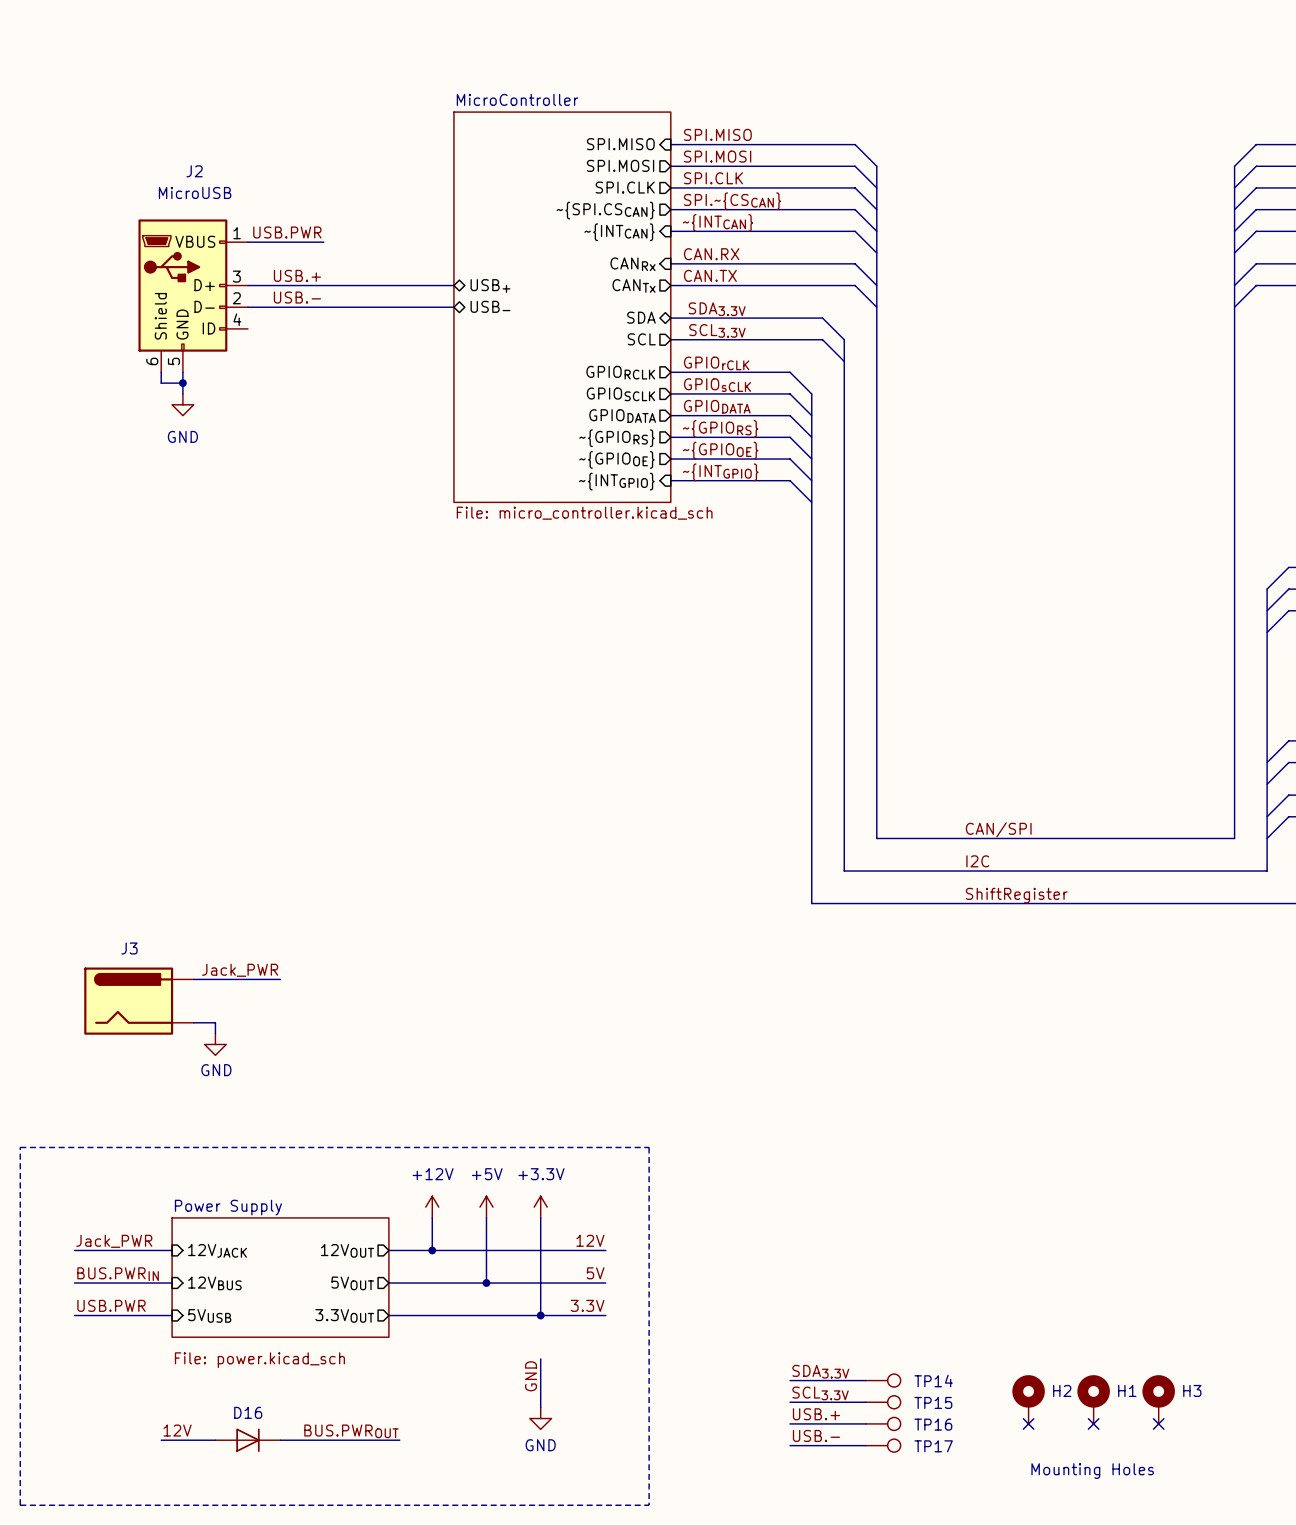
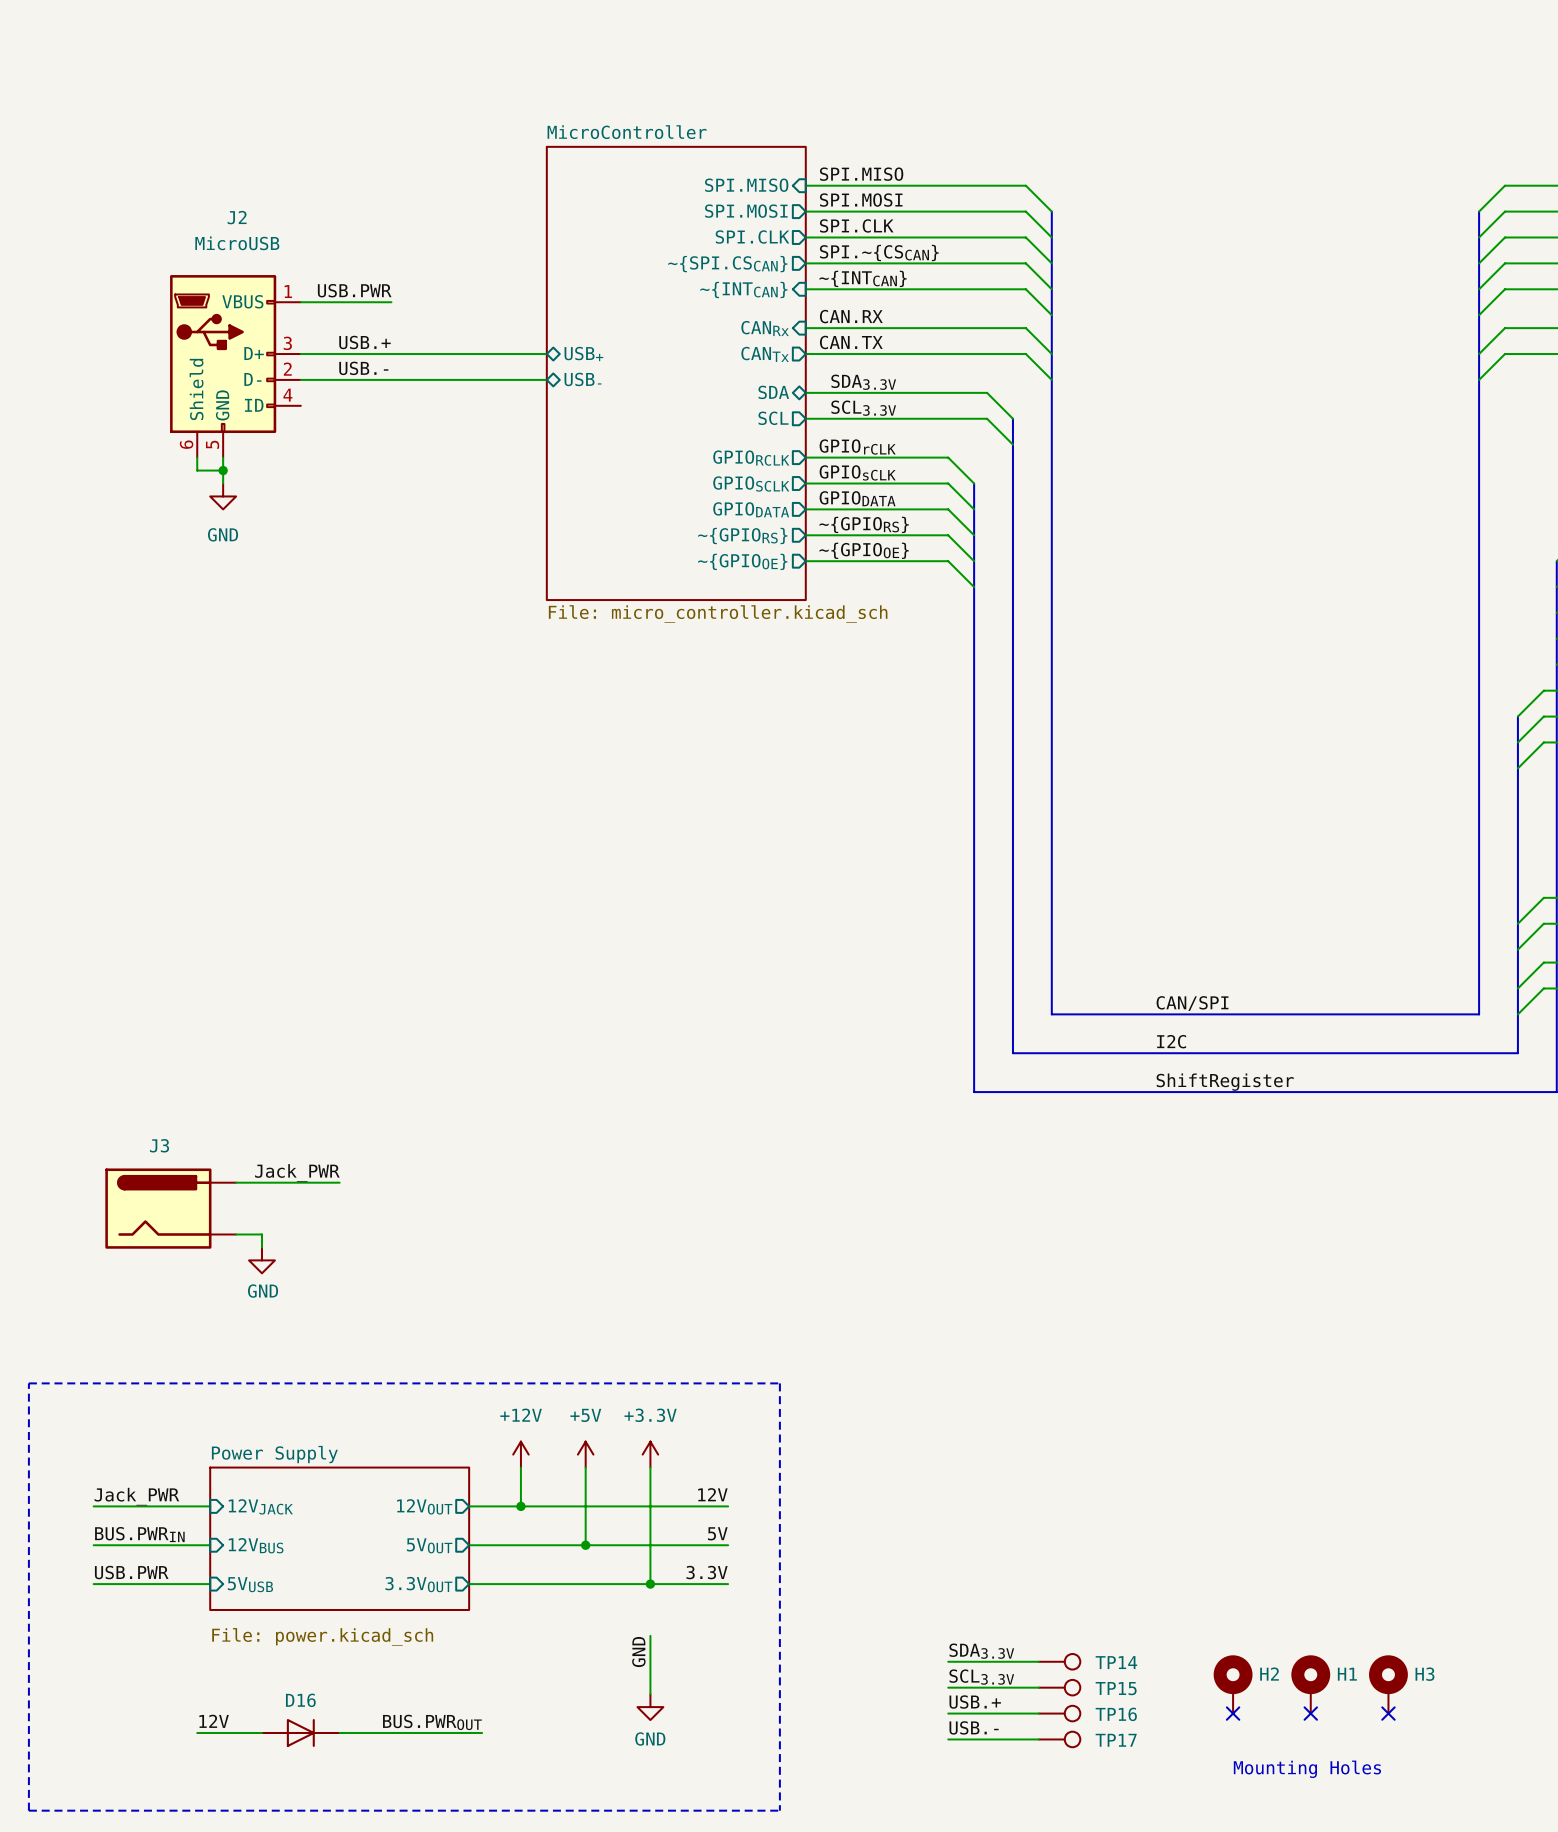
sheet MicroController shape: [453, 112, 671, 503] -> [546, 146, 806, 601]
label: ~{INTGPIO} (720, 472) -> none
wire: (670, 480) (790, 480) (811, 502) -> none
sheet pin: ~{INTGPIO} (616, 481) -> none

